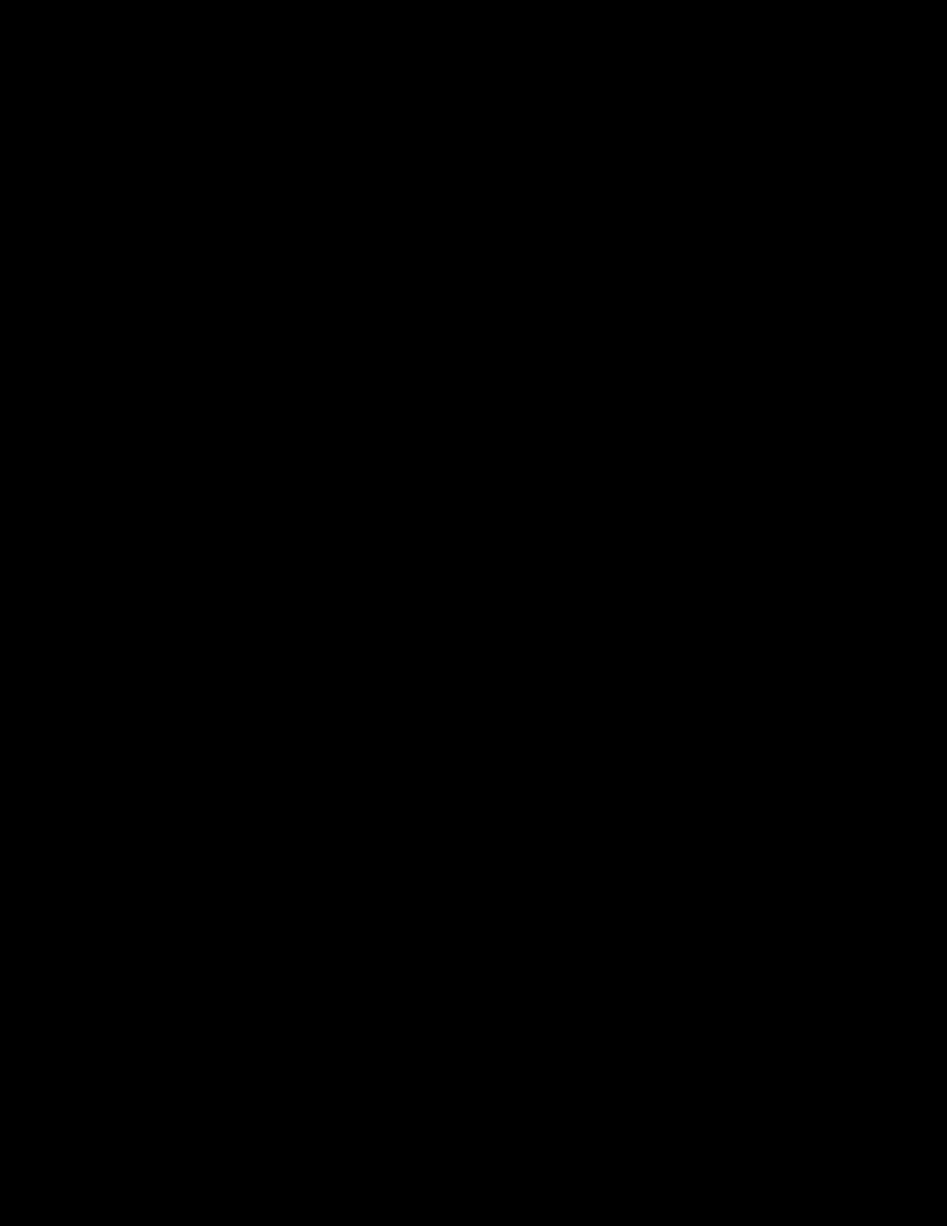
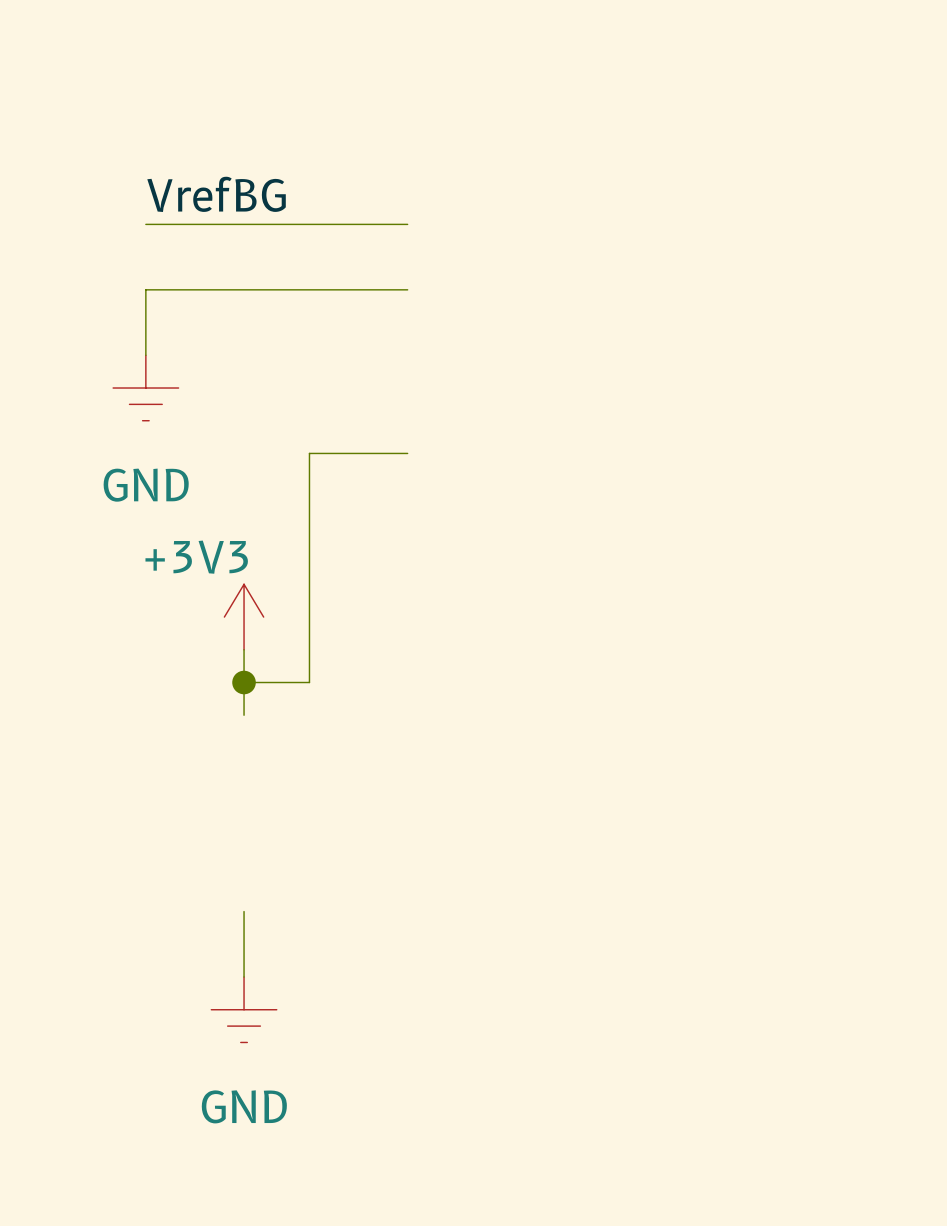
label: none -> VrefBG (216, 194)
wire: none -> (145, 224) (407, 224)
wire: none -> (407, 289) (145, 289) (145, 355)
power symbol: none -> GND (145, 388)
wire: none -> (407, 453) (309, 453) (309, 682) (244, 682)
power symbol: none -> +3V3 (244, 617)
wire: none -> (244, 649) (244, 715)
junction: none -> (244, 682)
wire: none -> (244, 911) (244, 977)
power symbol: none -> GND (244, 1009)

